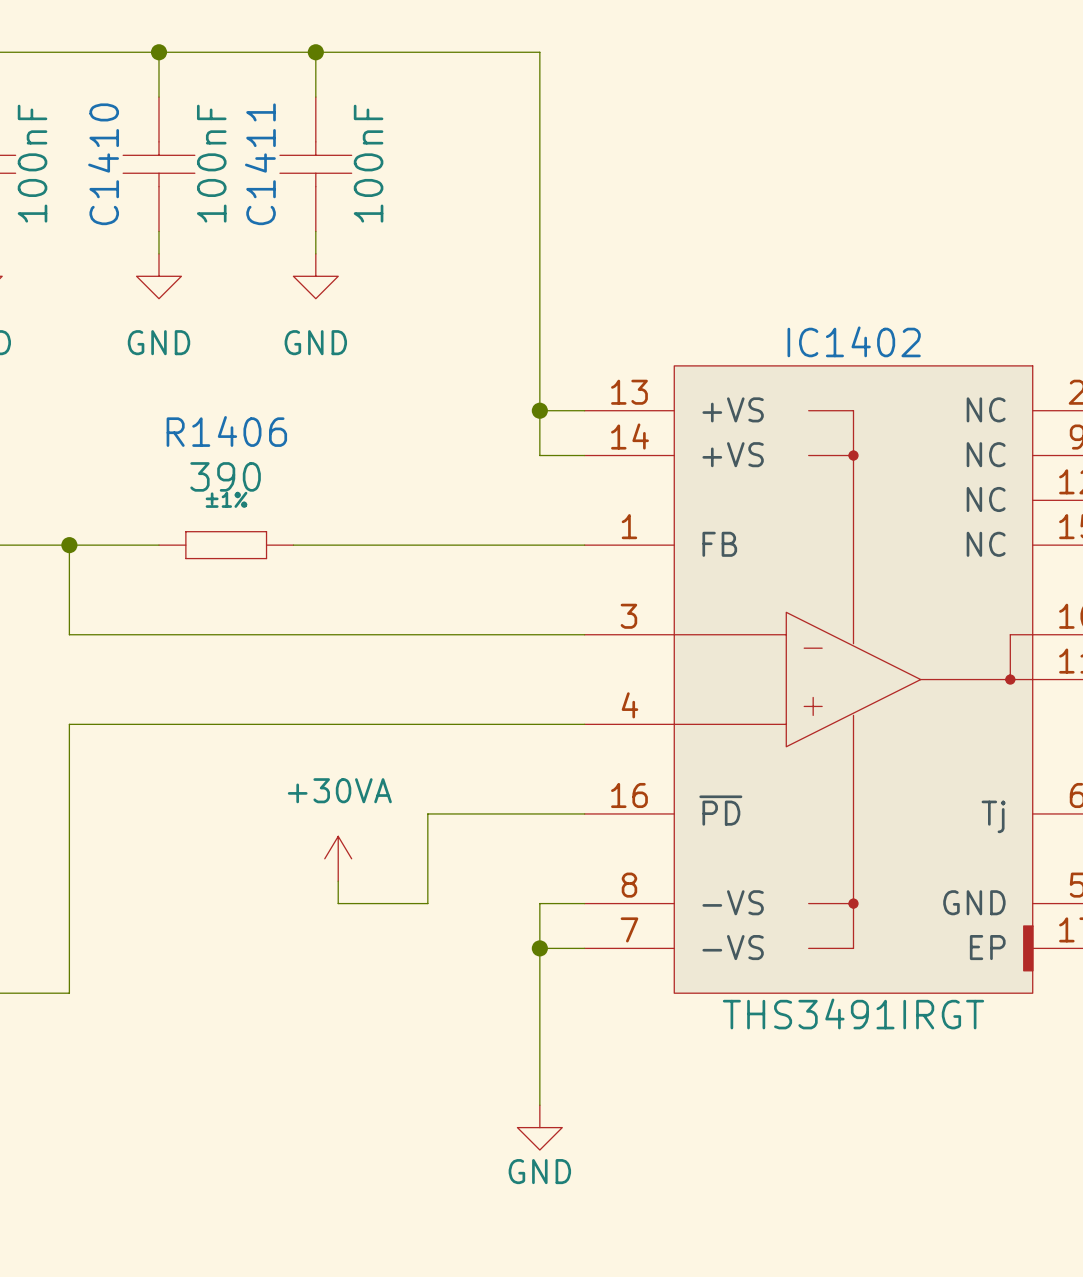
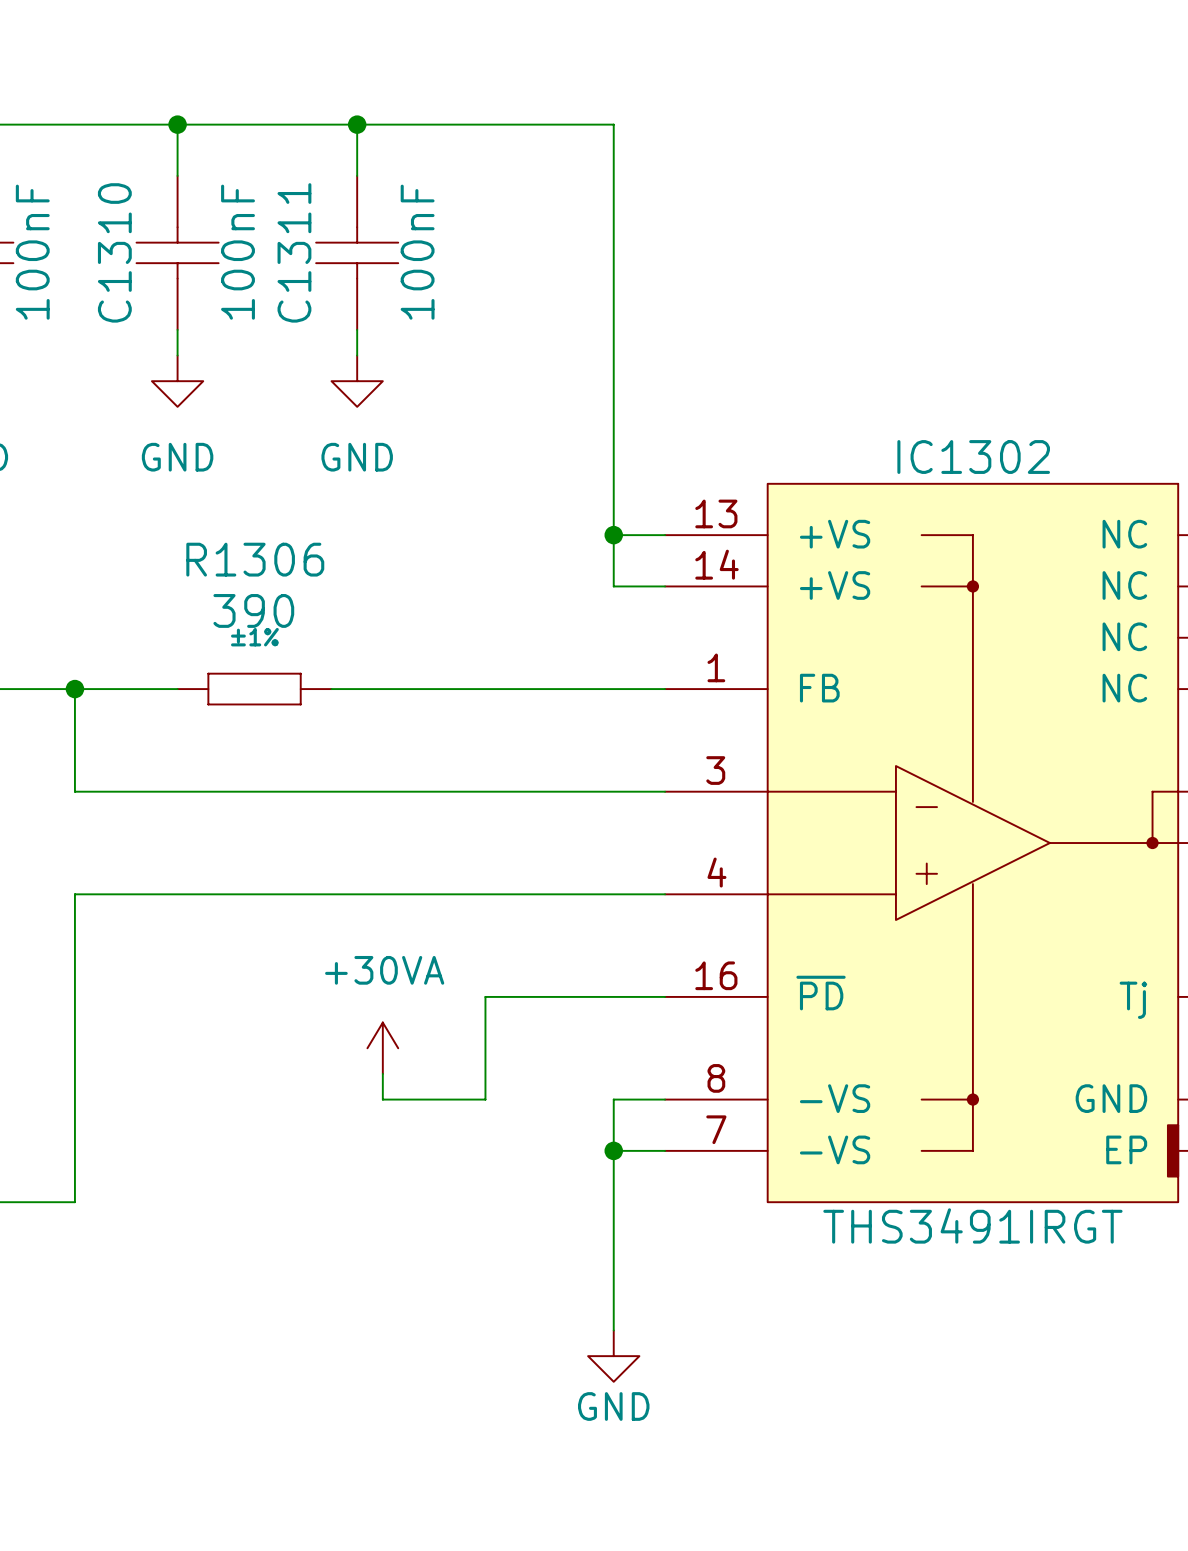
C1410 name: C1410 (103, 164) -> C1310 (114, 252)
C1411 name: C1411 (260, 164) -> C1311 (294, 252)
IC1402 name: IC1402 (854, 341) -> IC1302 (973, 457)
R1406 name: R1406 (226, 431) -> R1306 (255, 559)

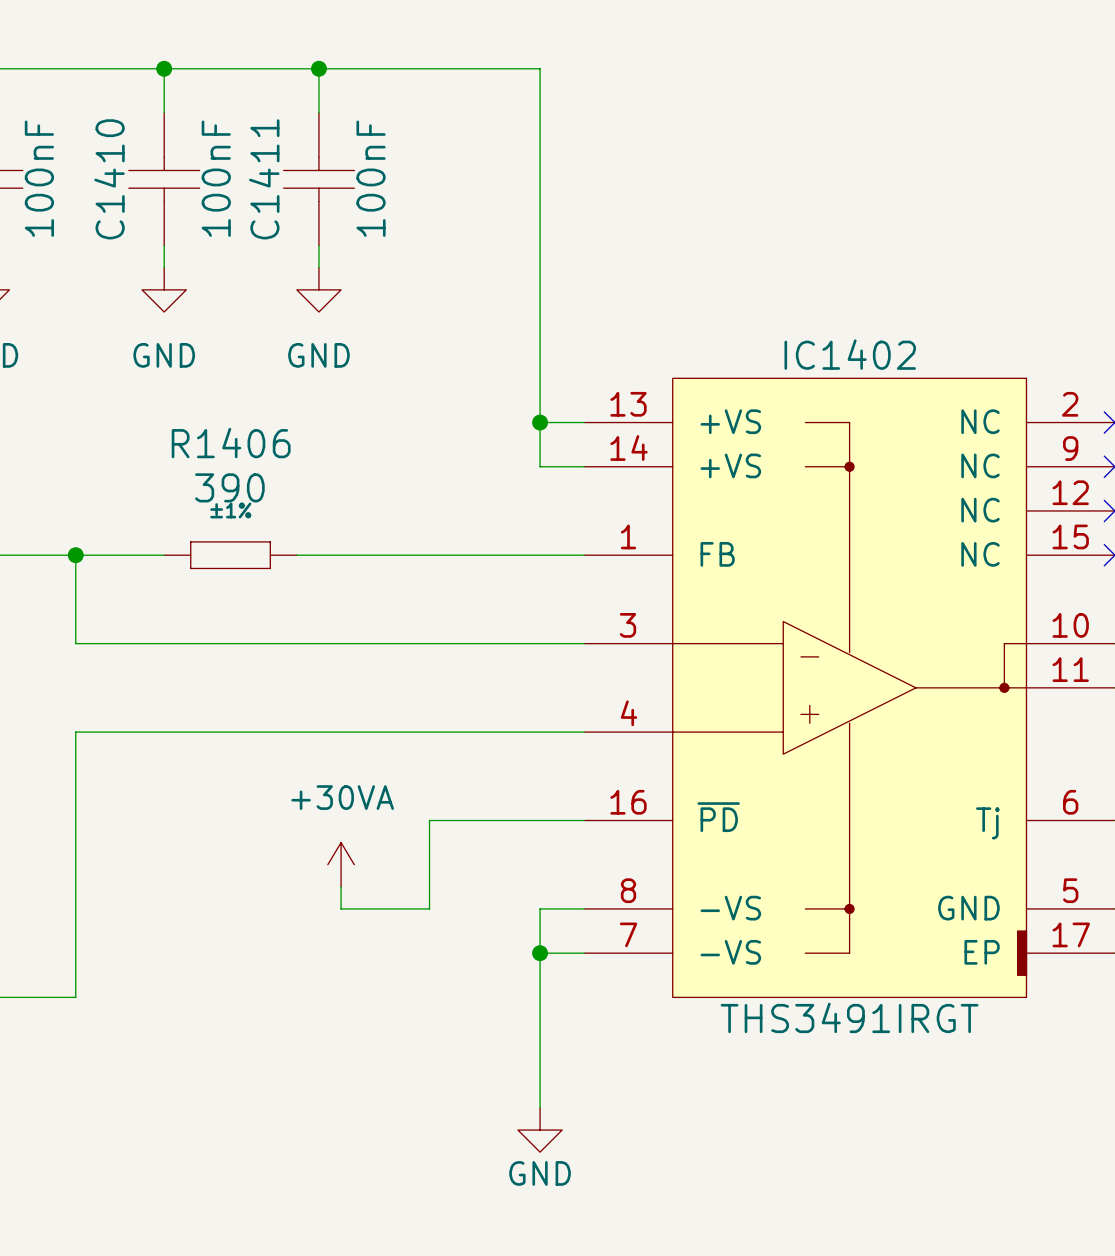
C1310 name: C1310 (114, 252) -> C1410 (109, 179)
C1311 name: C1311 (294, 252) -> C1411 (264, 179)
IC1302 name: IC1302 (973, 457) -> IC1402 (850, 354)
R1306 name: R1306 (255, 559) -> R1406 (231, 443)

